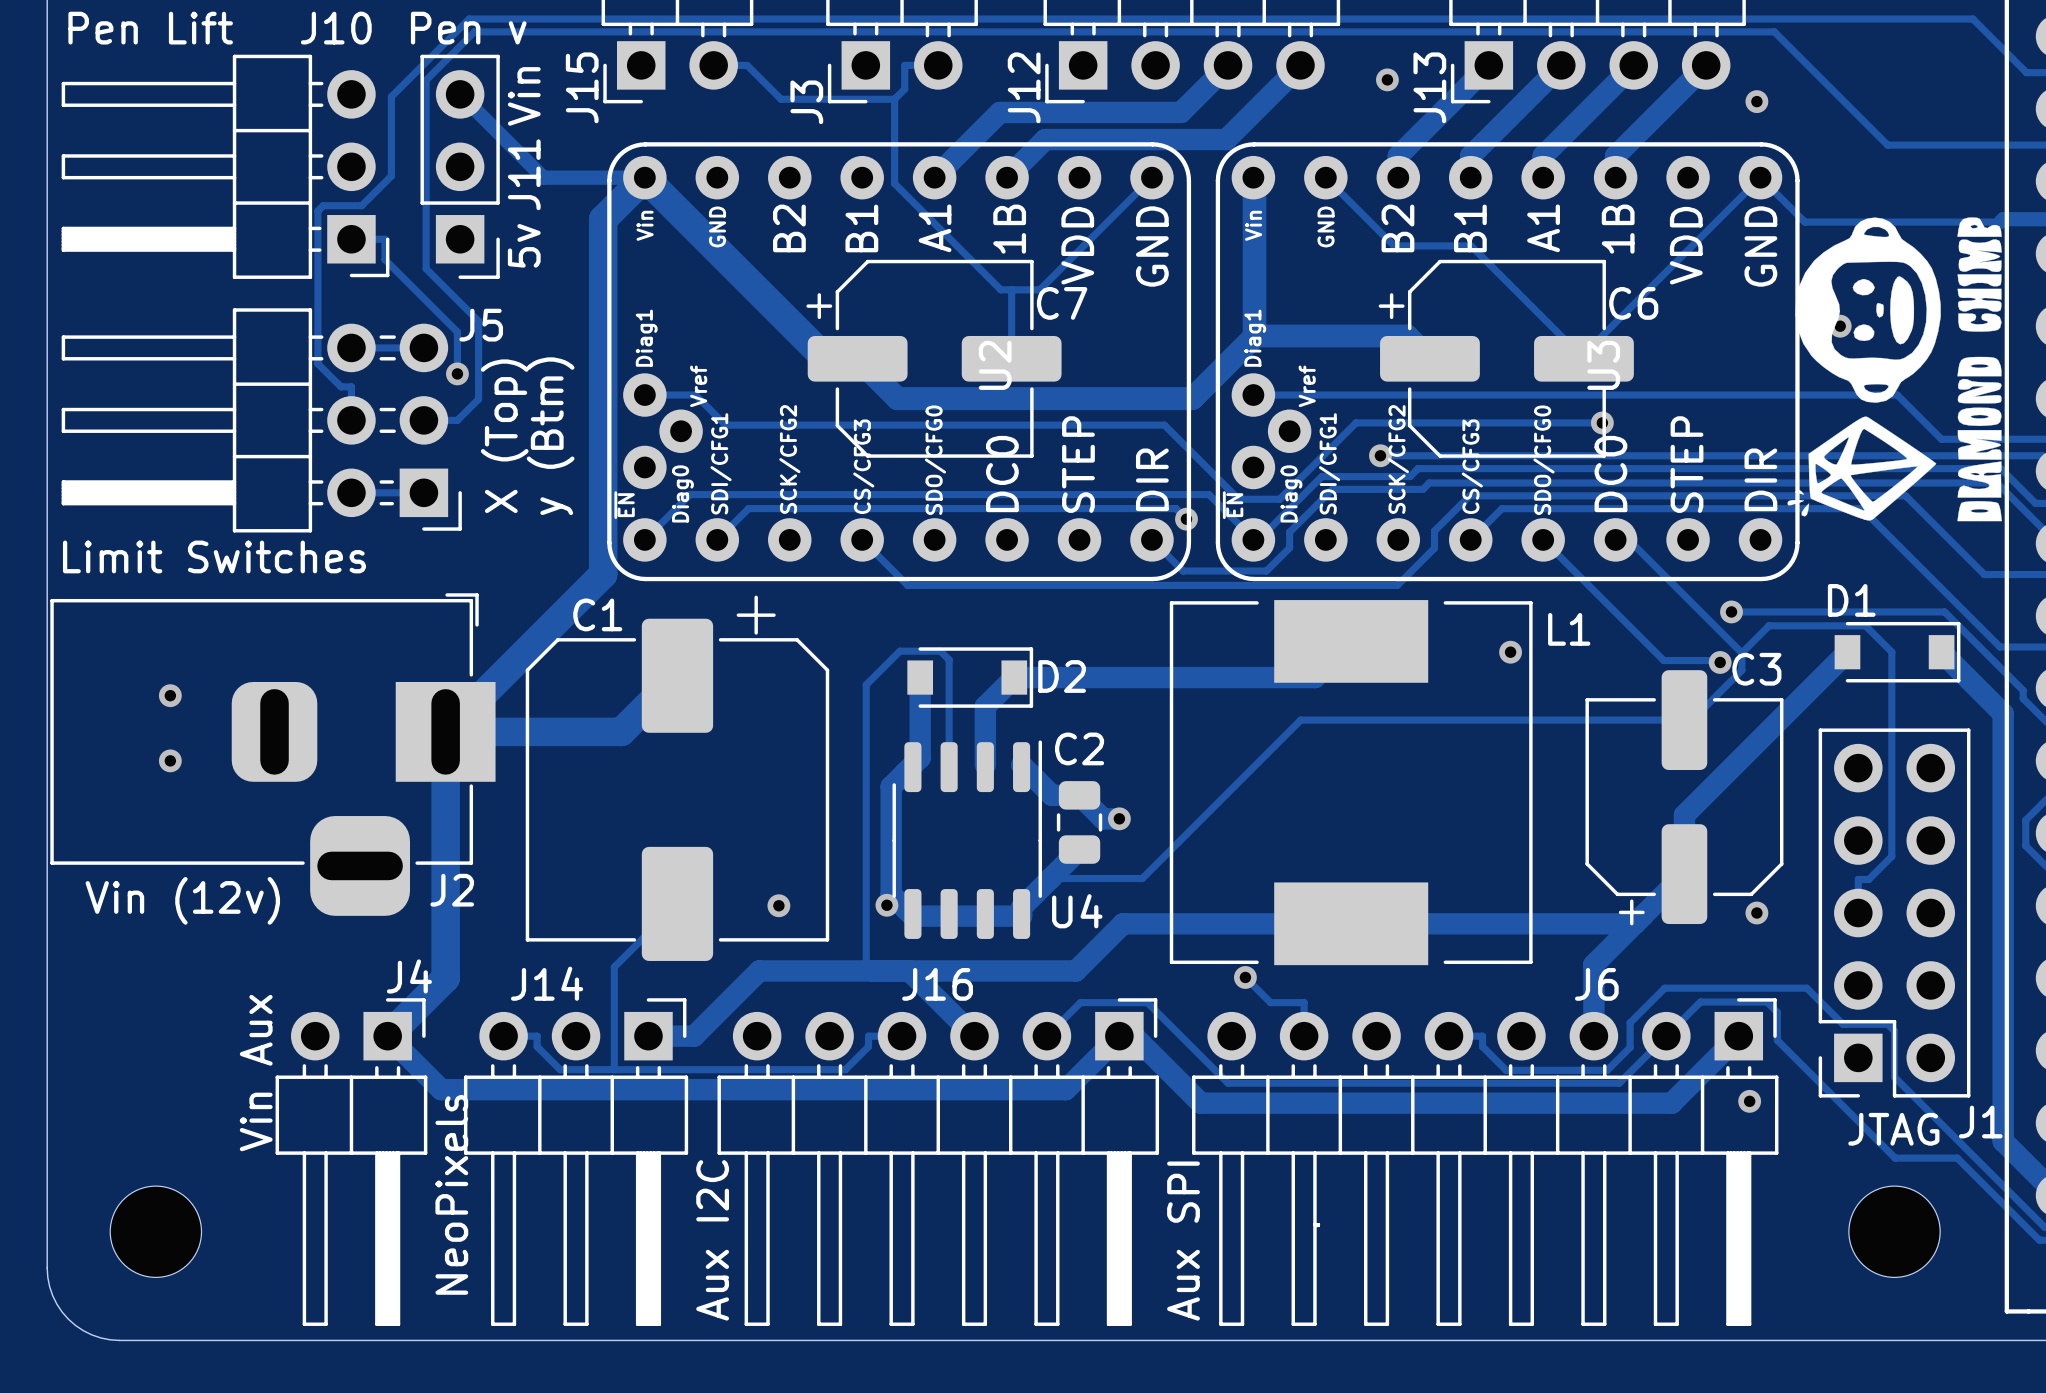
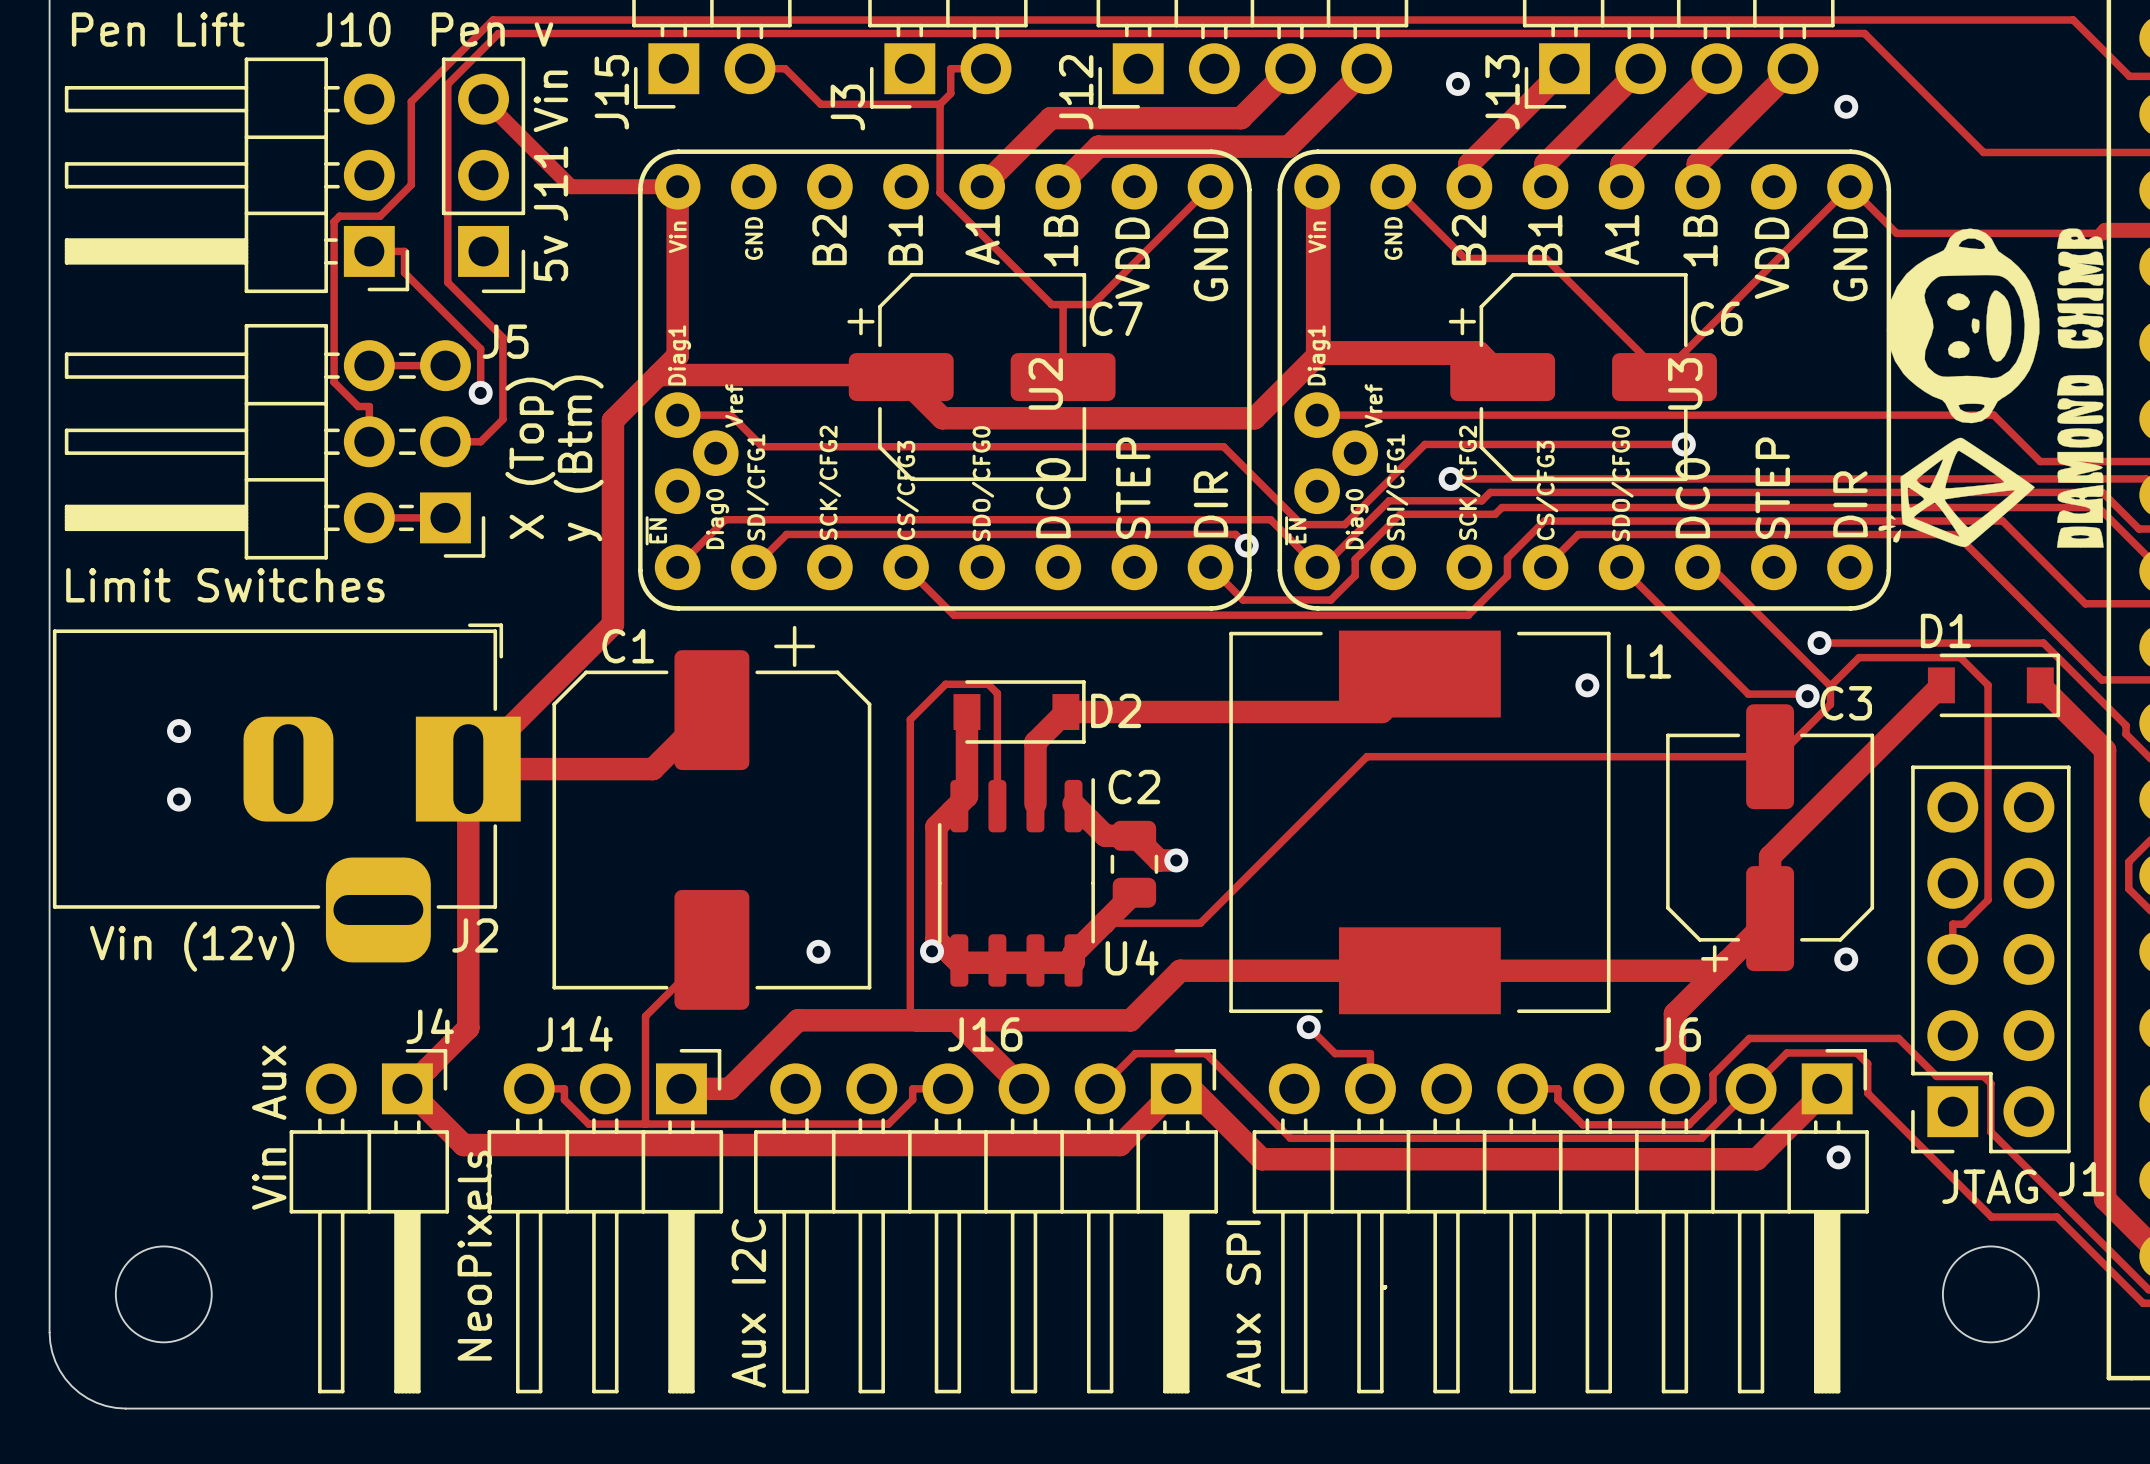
via: (1840, 326) -> none
track: (1254, 335) (1192, 398) (897, 398) (857, 358) (825, 358) (644, 177) (603, 219) (603, 574) (583, 594) -> (677, 186) (677, 355) (612, 420) (612, 624)
track: none -> (658, 375) (899, 375) (901, 377)
track width: thick (583, 594) (445, 731) -> thin (612, 624) (468, 769)
track width: thick (677, 675) (621, 731) (445, 731) -> thin (711, 710) (652, 769) (468, 769)
track width: thick (445, 731) (445, 978) (387, 1036) -> thin (468, 769) (468, 1027) (407, 1088)

